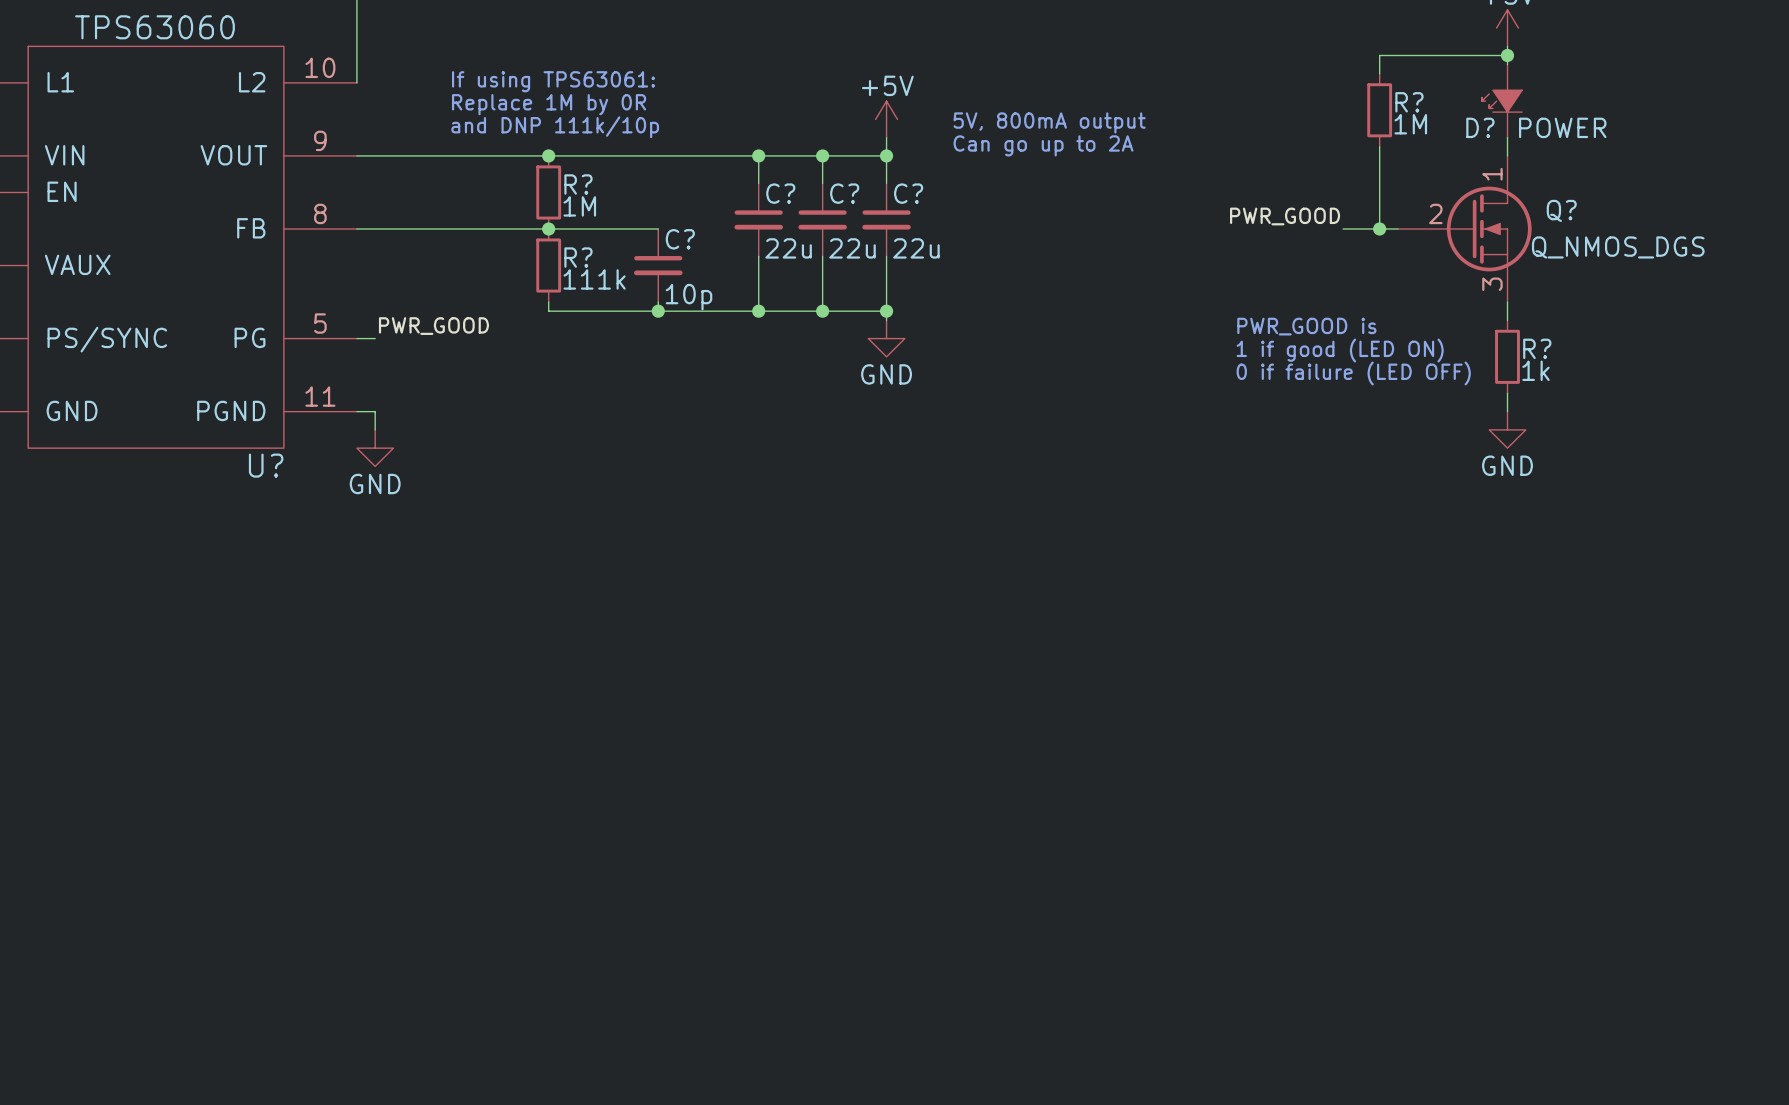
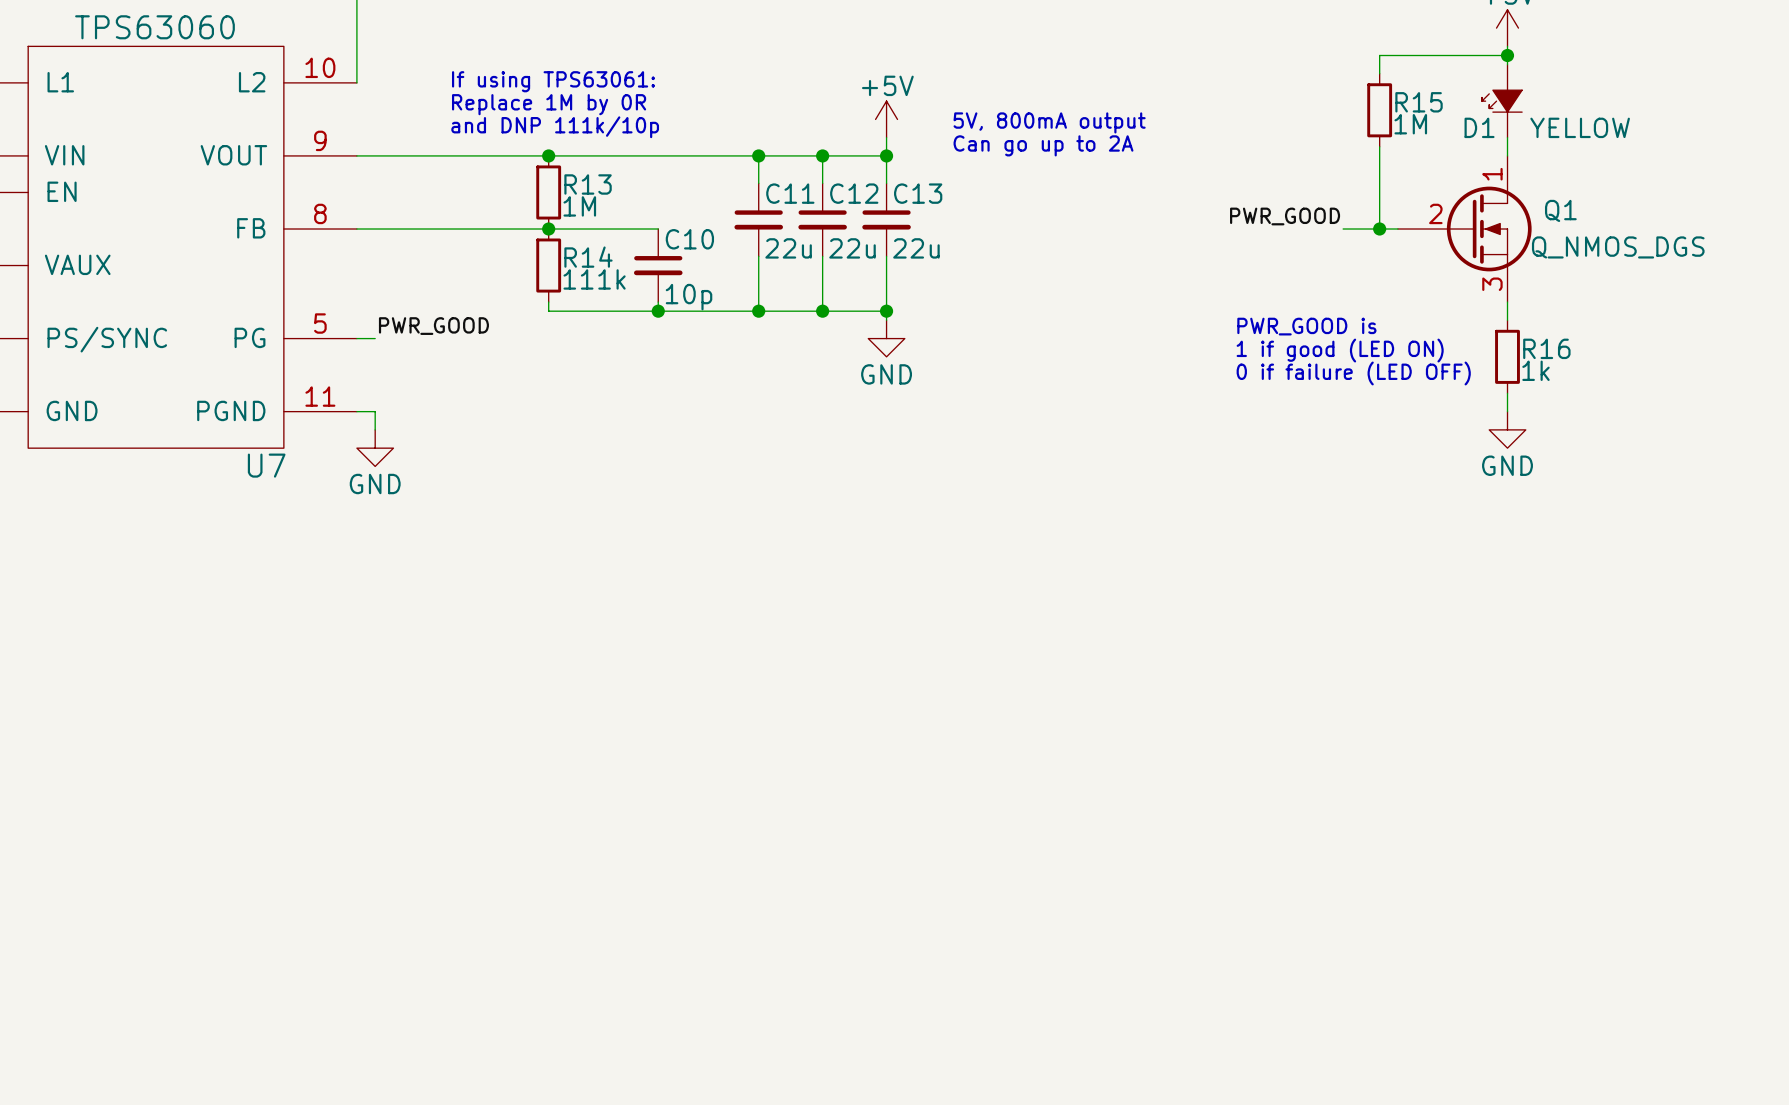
R? name: R? (1409, 102) -> R15 (1419, 102)
D? name: D? (1480, 127) -> D1 (1479, 127)
D? value: POWER (1562, 127) -> YELLOW (1580, 127)
R? name: R? (578, 184) -> R13 (588, 184)
C? name: C? (780, 193) -> C11 (790, 193)
C? name: C? (844, 193) -> C12 (854, 193)
C? name: C? (908, 193) -> C13 (918, 193)
Q? name: Q? (1561, 210) -> Q1 (1560, 210)
C? name: C? (680, 239) -> C10 (689, 239)
R? name: R? (578, 257) -> R14 (588, 257)
R? name: R? (1537, 348) -> R16 (1546, 348)
U? name: U? (266, 465) -> U7 (266, 465)

